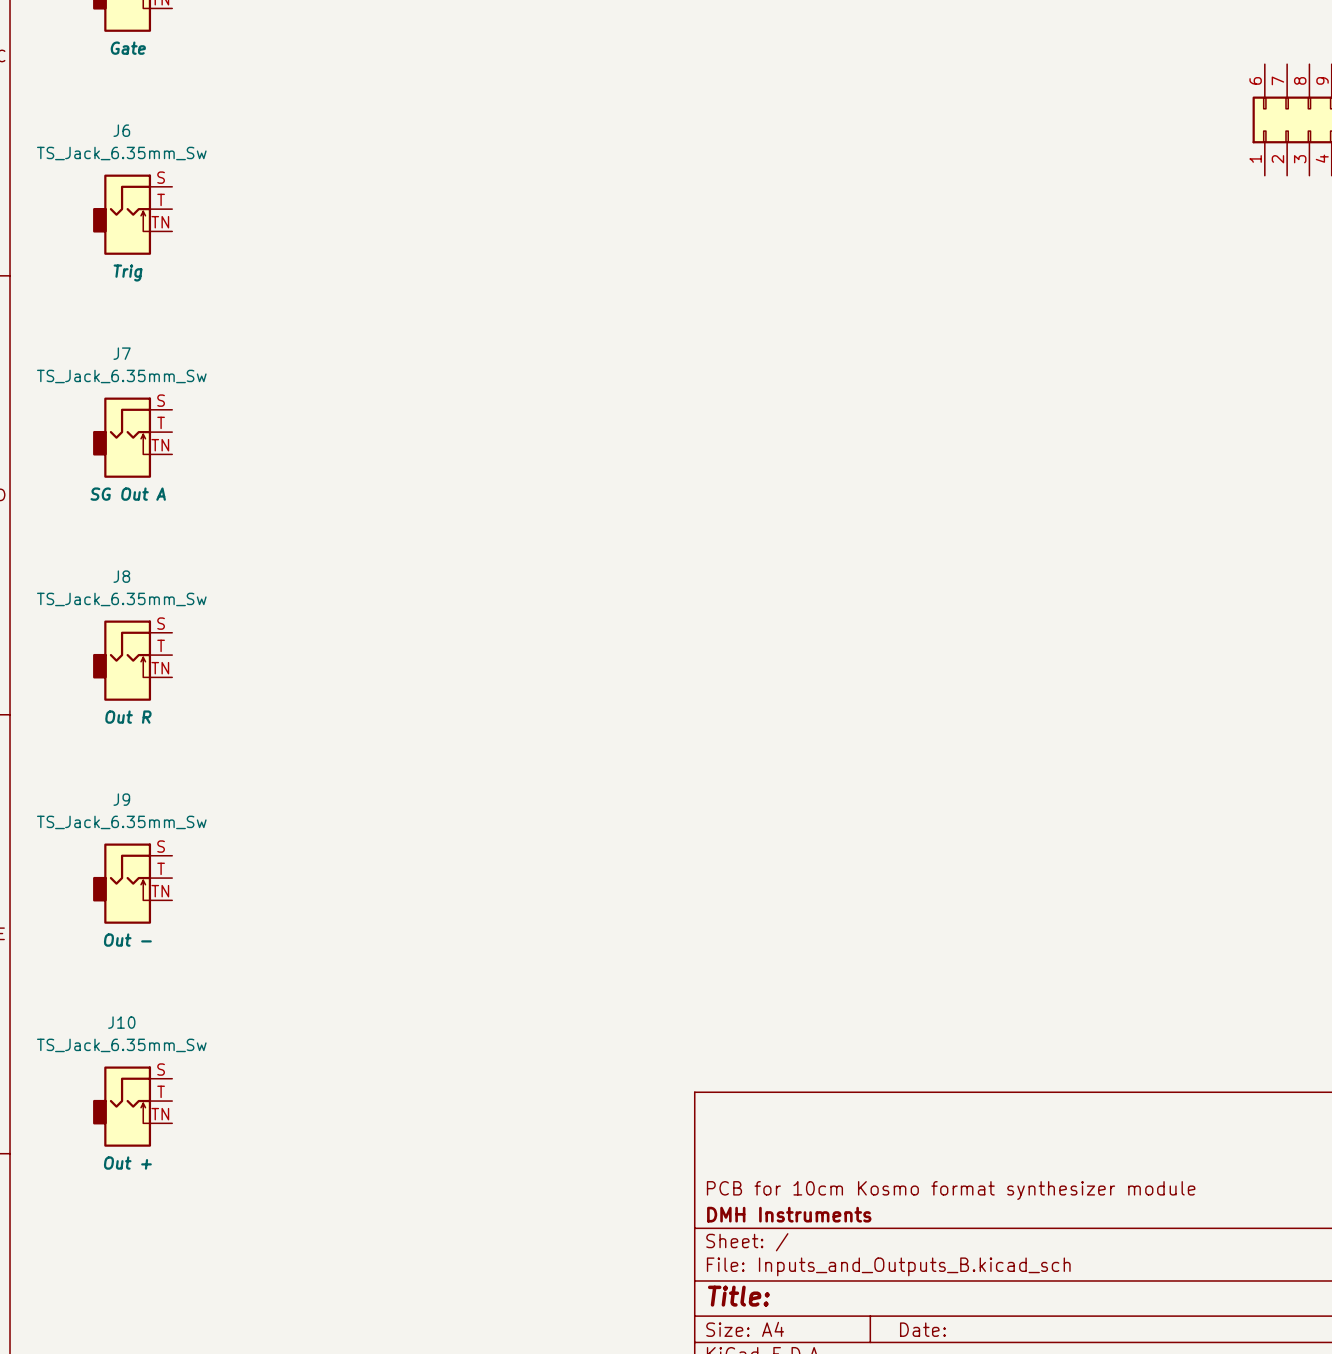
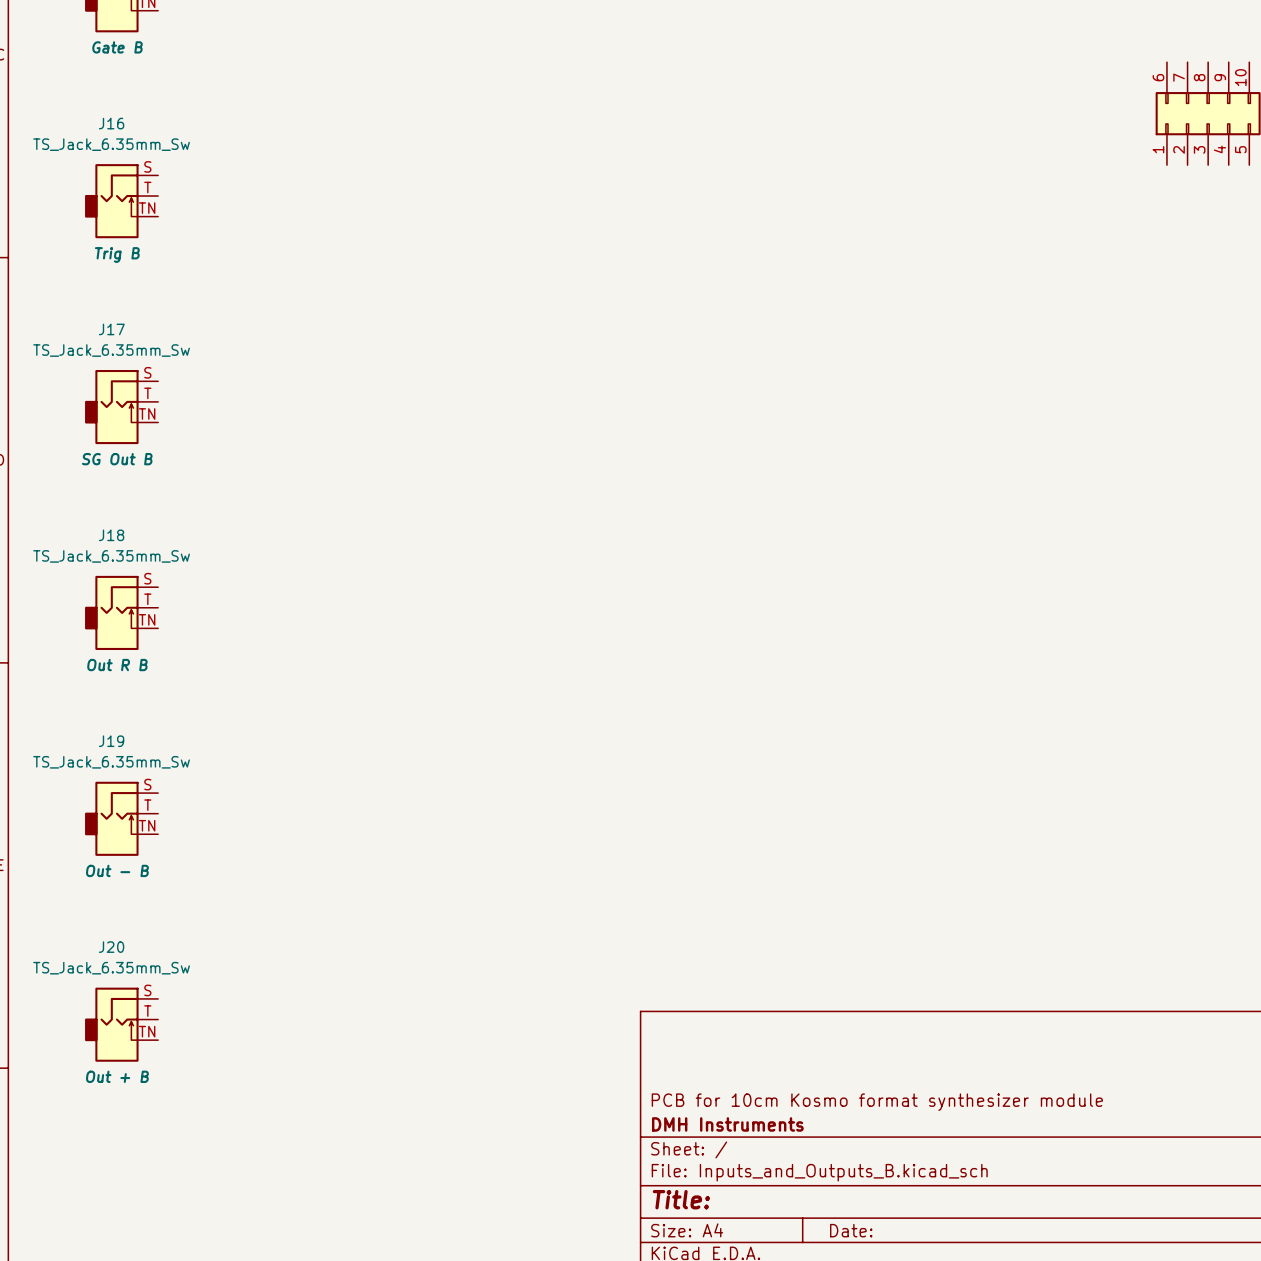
part text: Gate (128, 48) -> Gate B (117, 47)
J6 name: J6 (121, 130) -> J16 (111, 123)
J6 text: Trig (128, 273) -> Trig B (117, 254)
J7 name: J7 (122, 353) -> J17 (111, 329)
J7 text: SG Out A (128, 494) -> SG Out B (117, 459)
J8 name: J8 (121, 576) -> J18 (111, 535)
J8 text: Out R (128, 717) -> Out R B (117, 665)
J9 name: J9 (121, 799) -> J19 (111, 741)
J9 text: Out - (127, 940) -> Out - B (117, 870)
J10 name: J10 (121, 1022) -> J20 (111, 947)
J10 text: Out + (127, 1163) -> Out + B (117, 1076)

